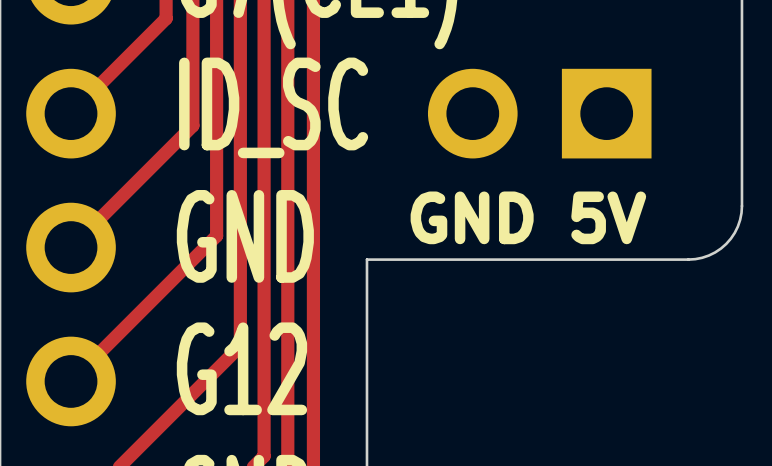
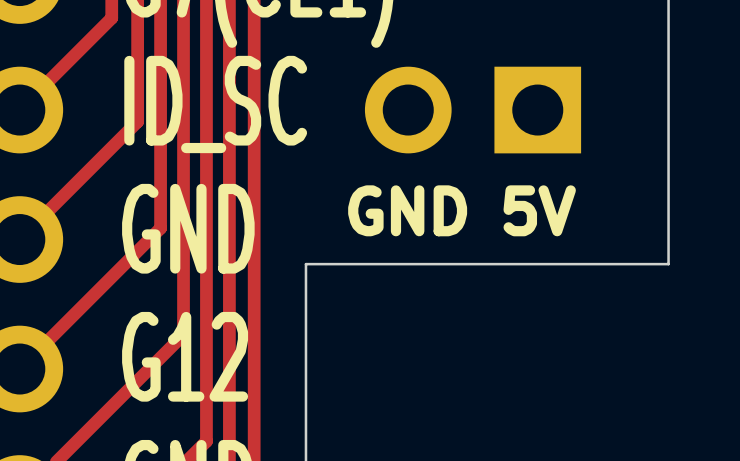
board edge: (741, 206) (737, 226) (726, 243) (715, 252) (695, 259) (366, 259) (366, 272) -> (668, 199) (668, 264) (305, 264)

